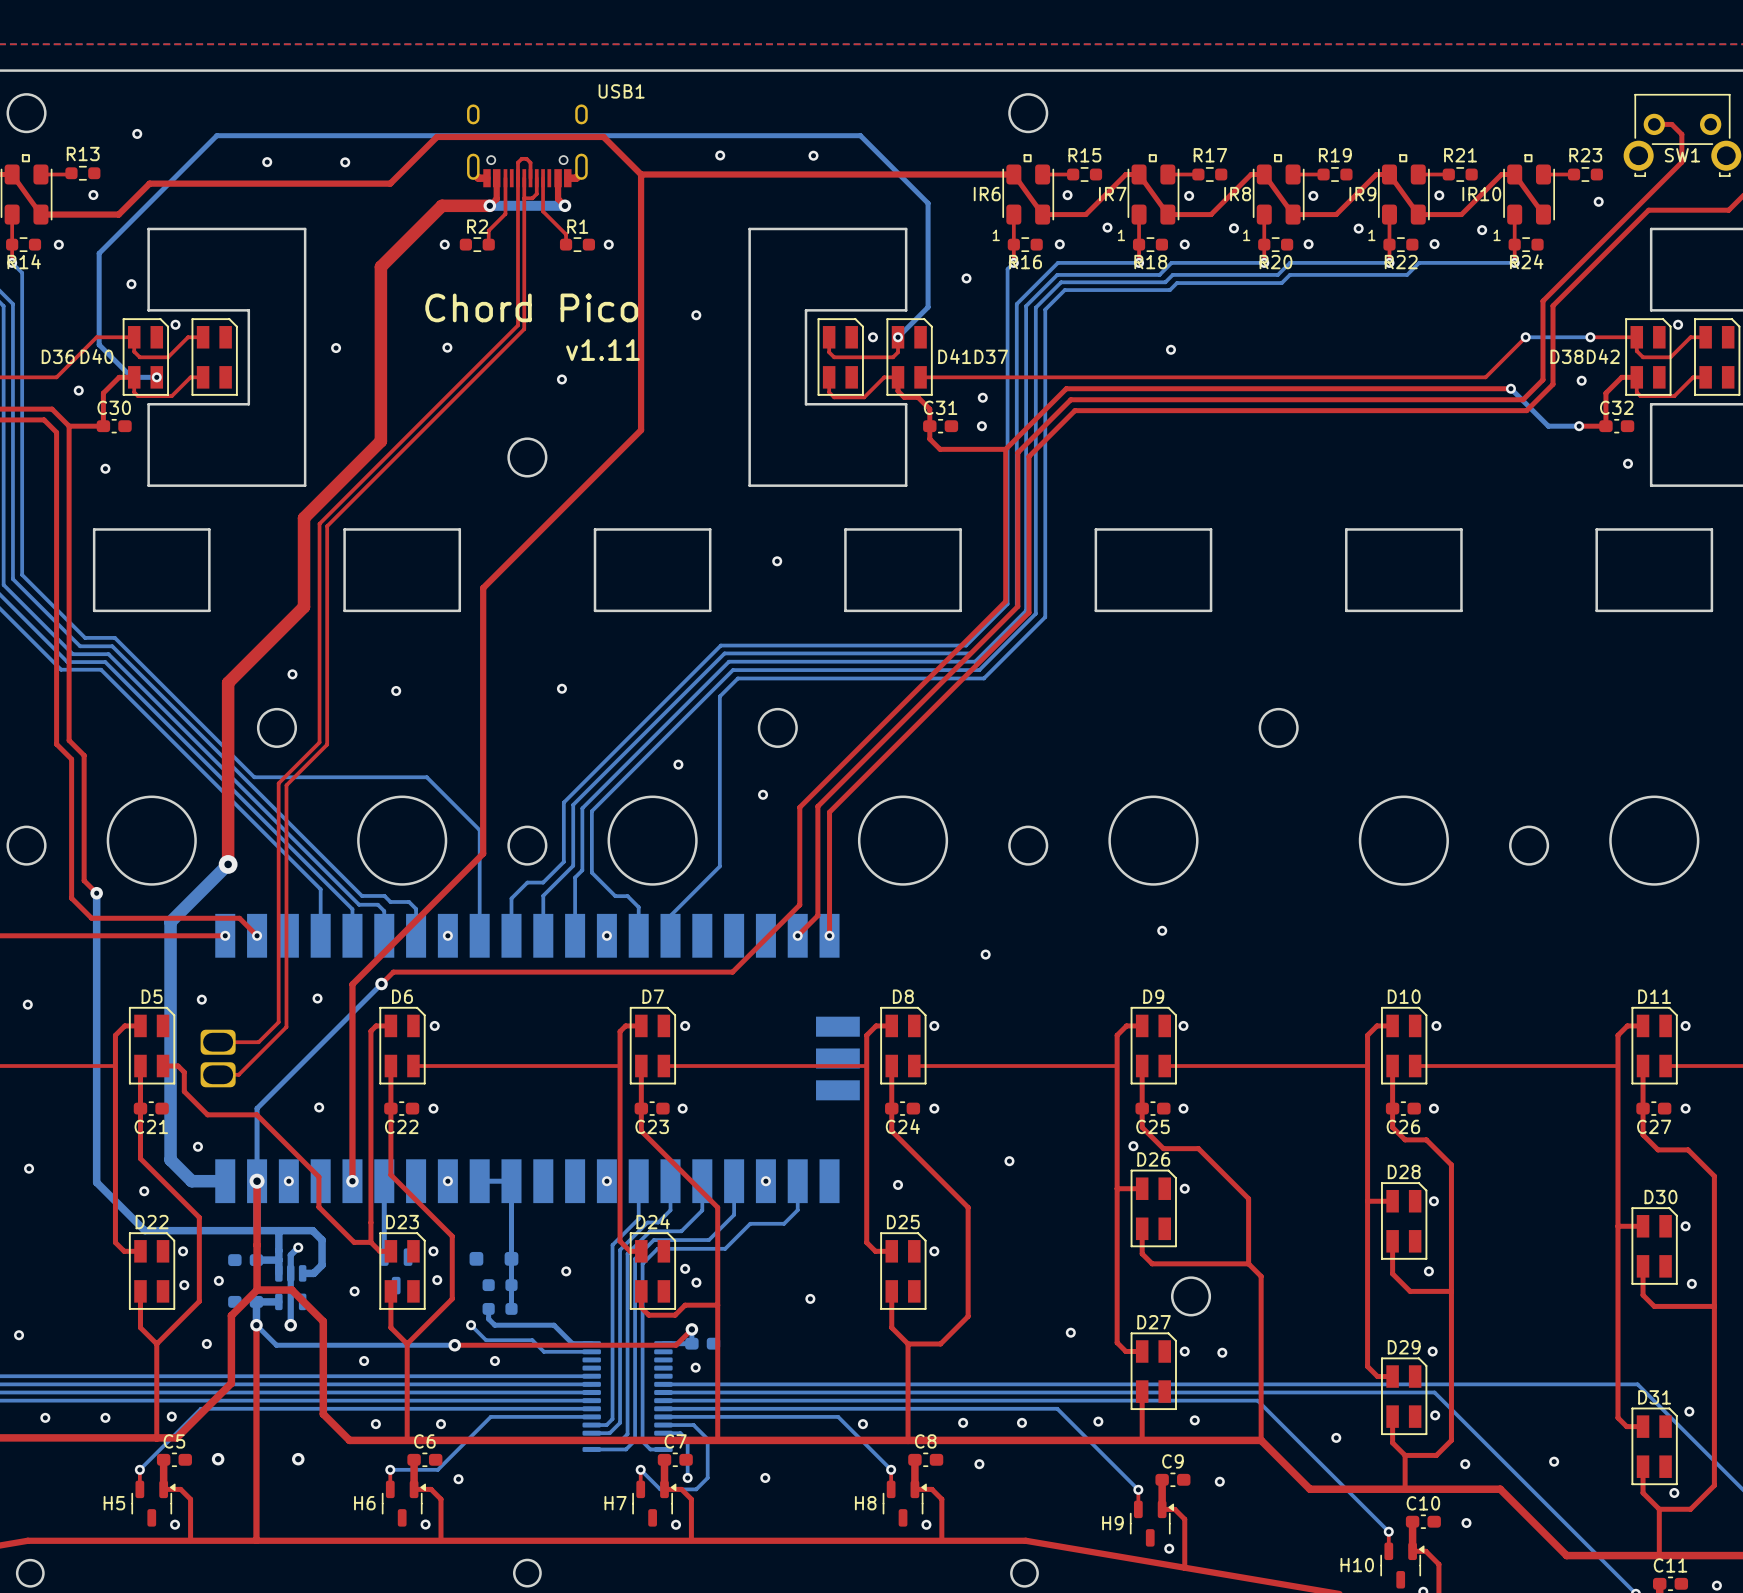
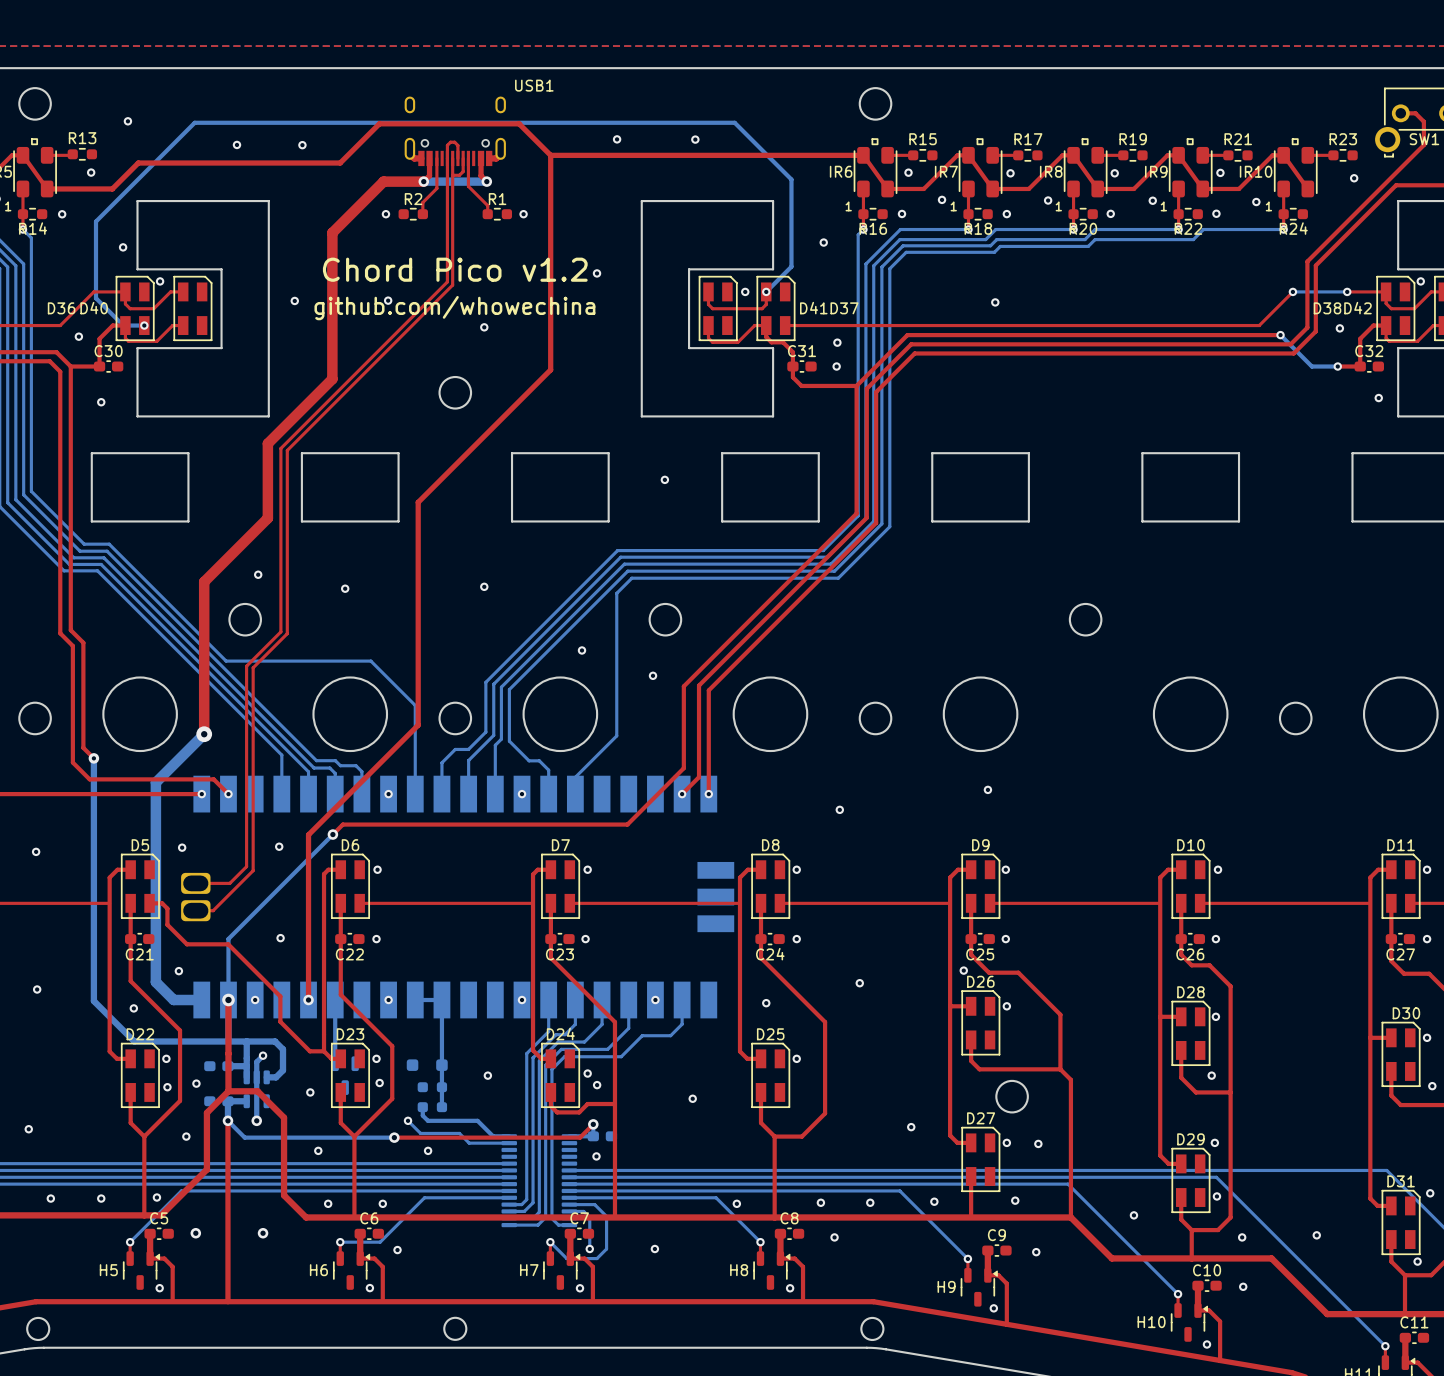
text: Chord Pico (531, 307) -> Chord Pico v1.2 (455, 269)
text: v1.11 (602, 350) -> none
text: none -> github.com/whowechina (454, 308)

